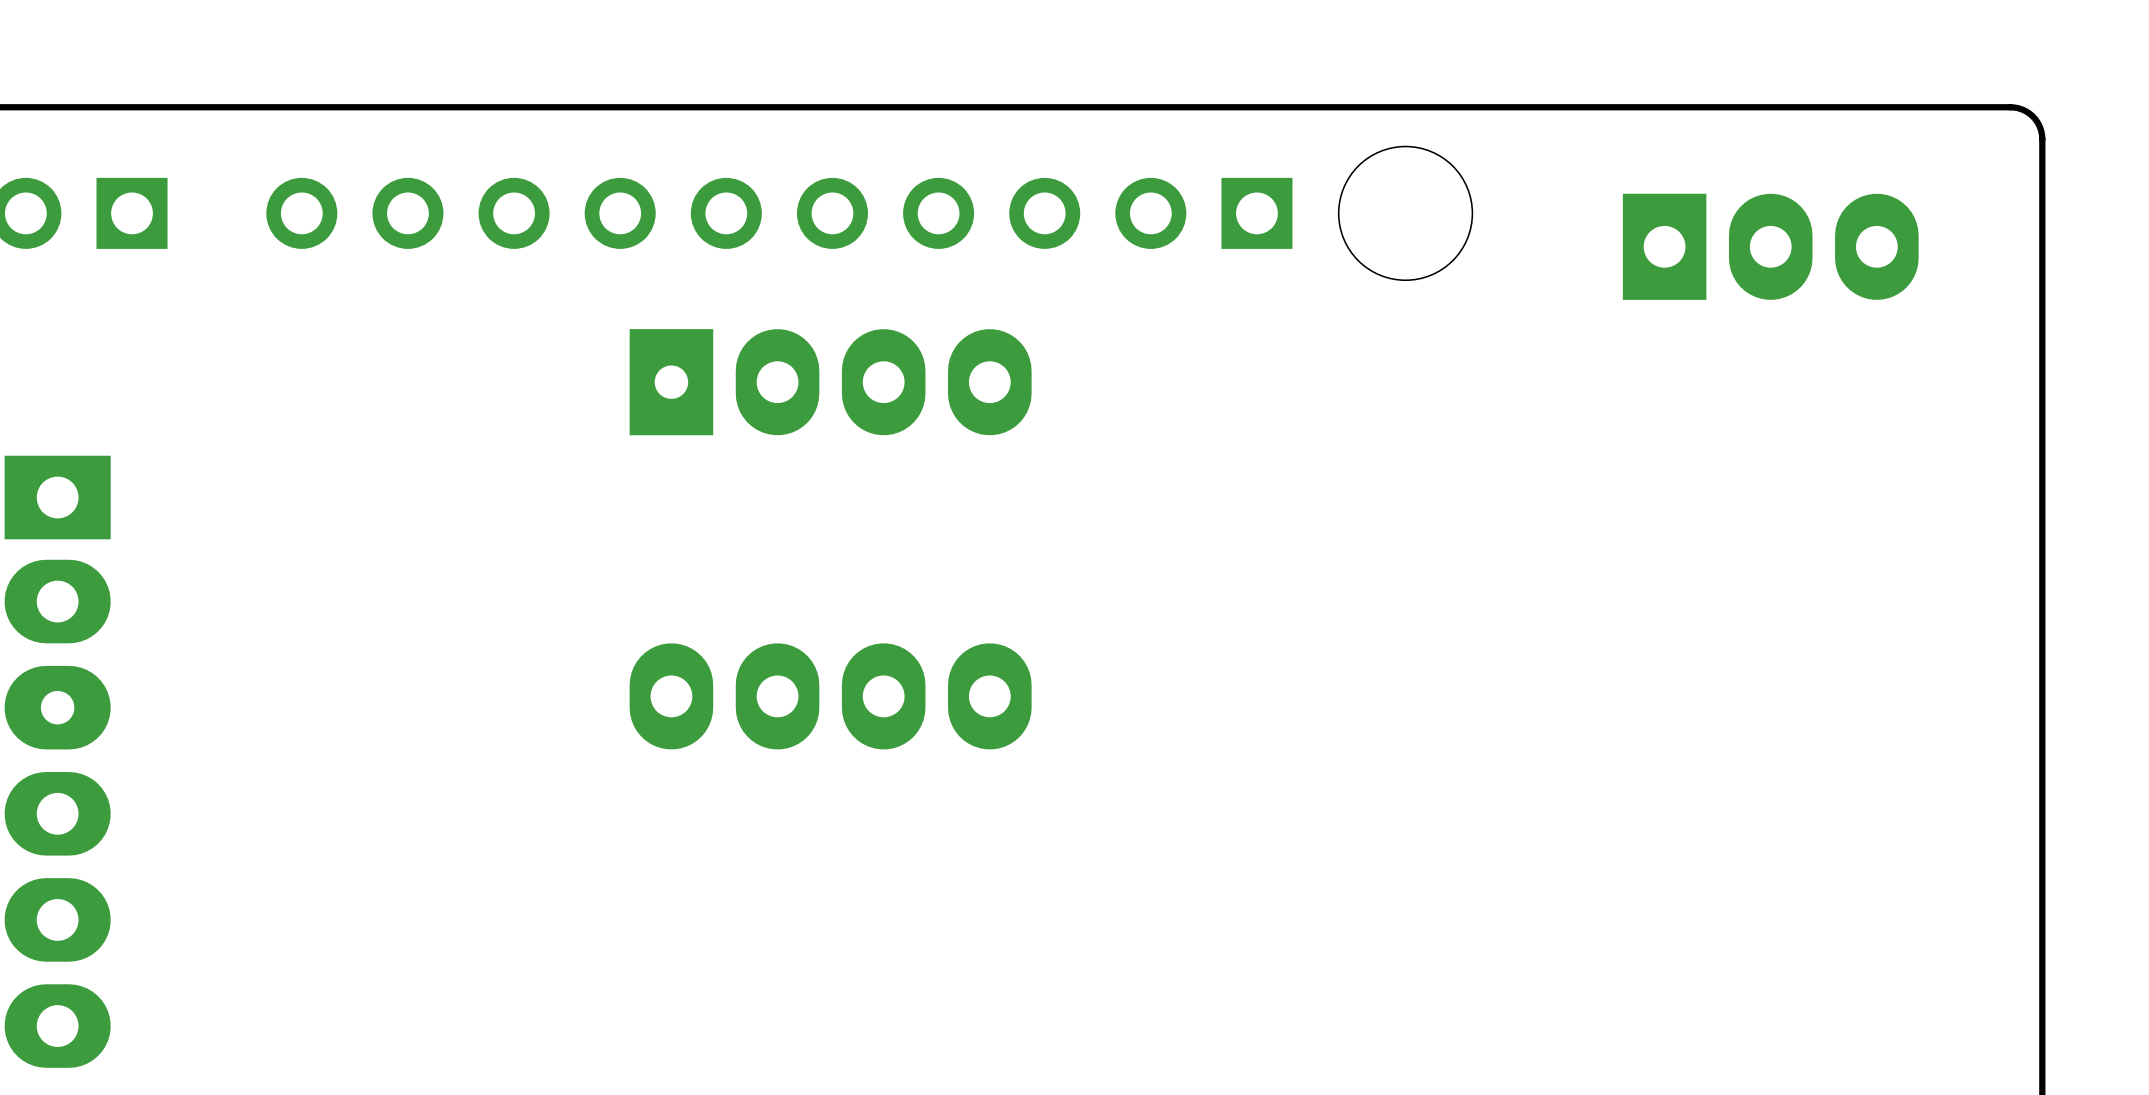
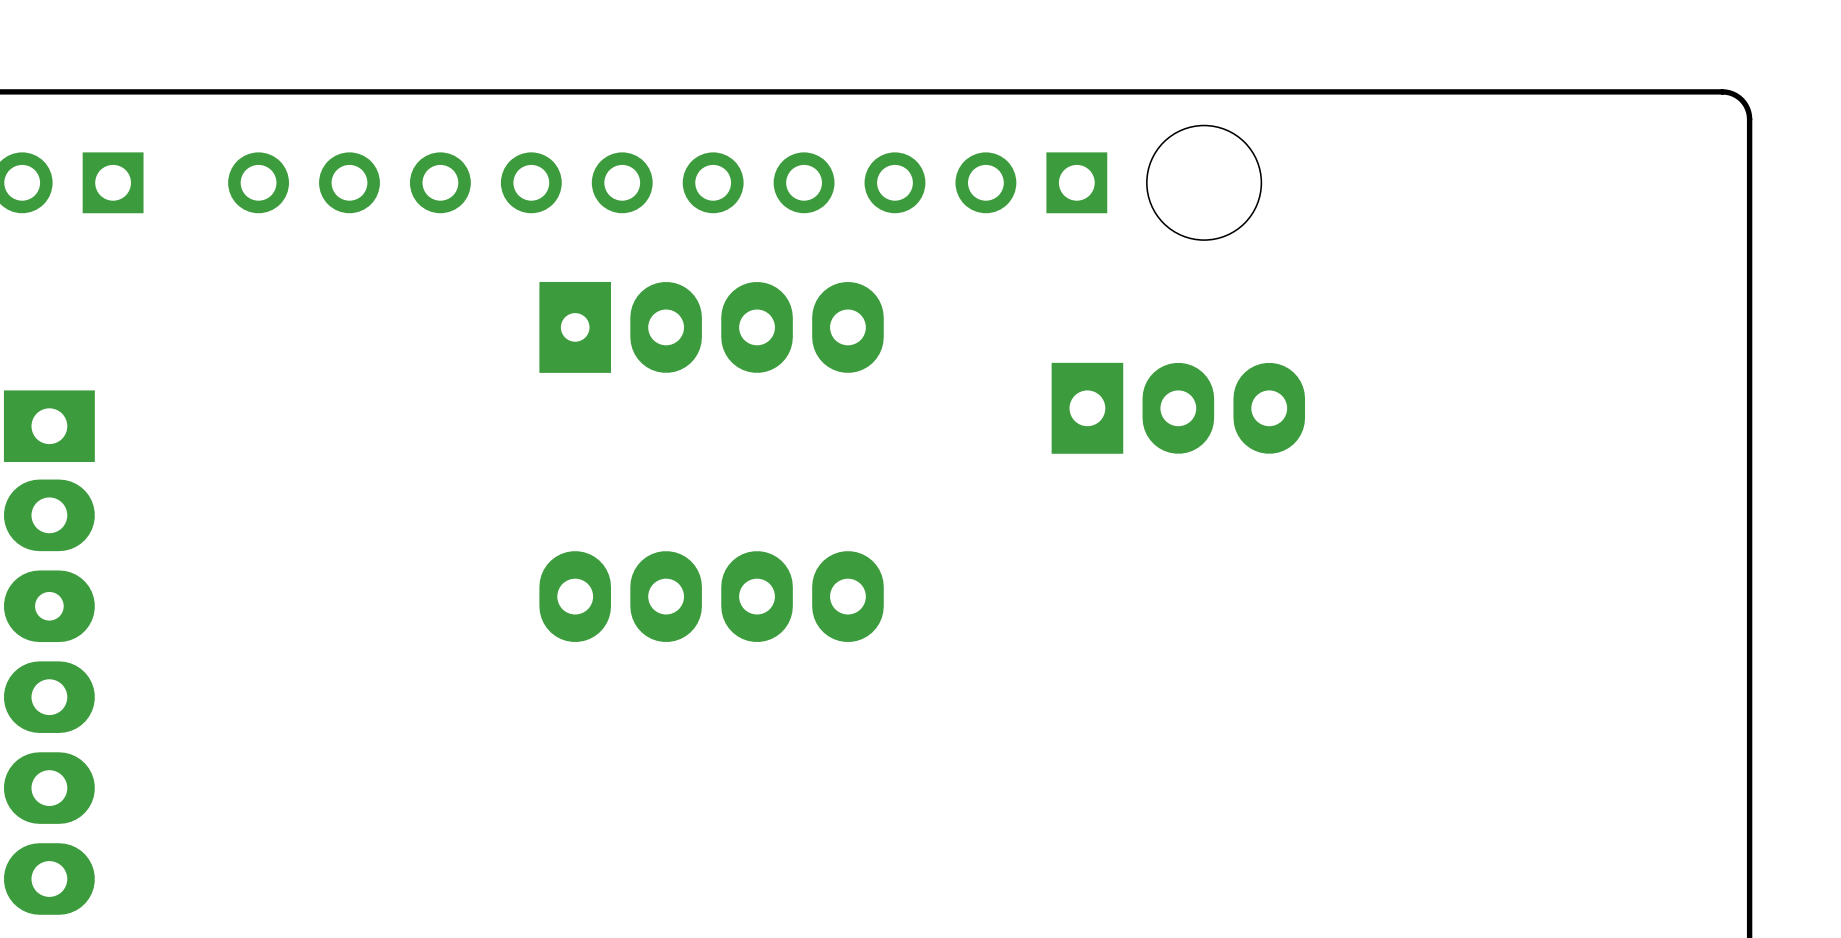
part position: (1770, 246) -> (1178, 408)

